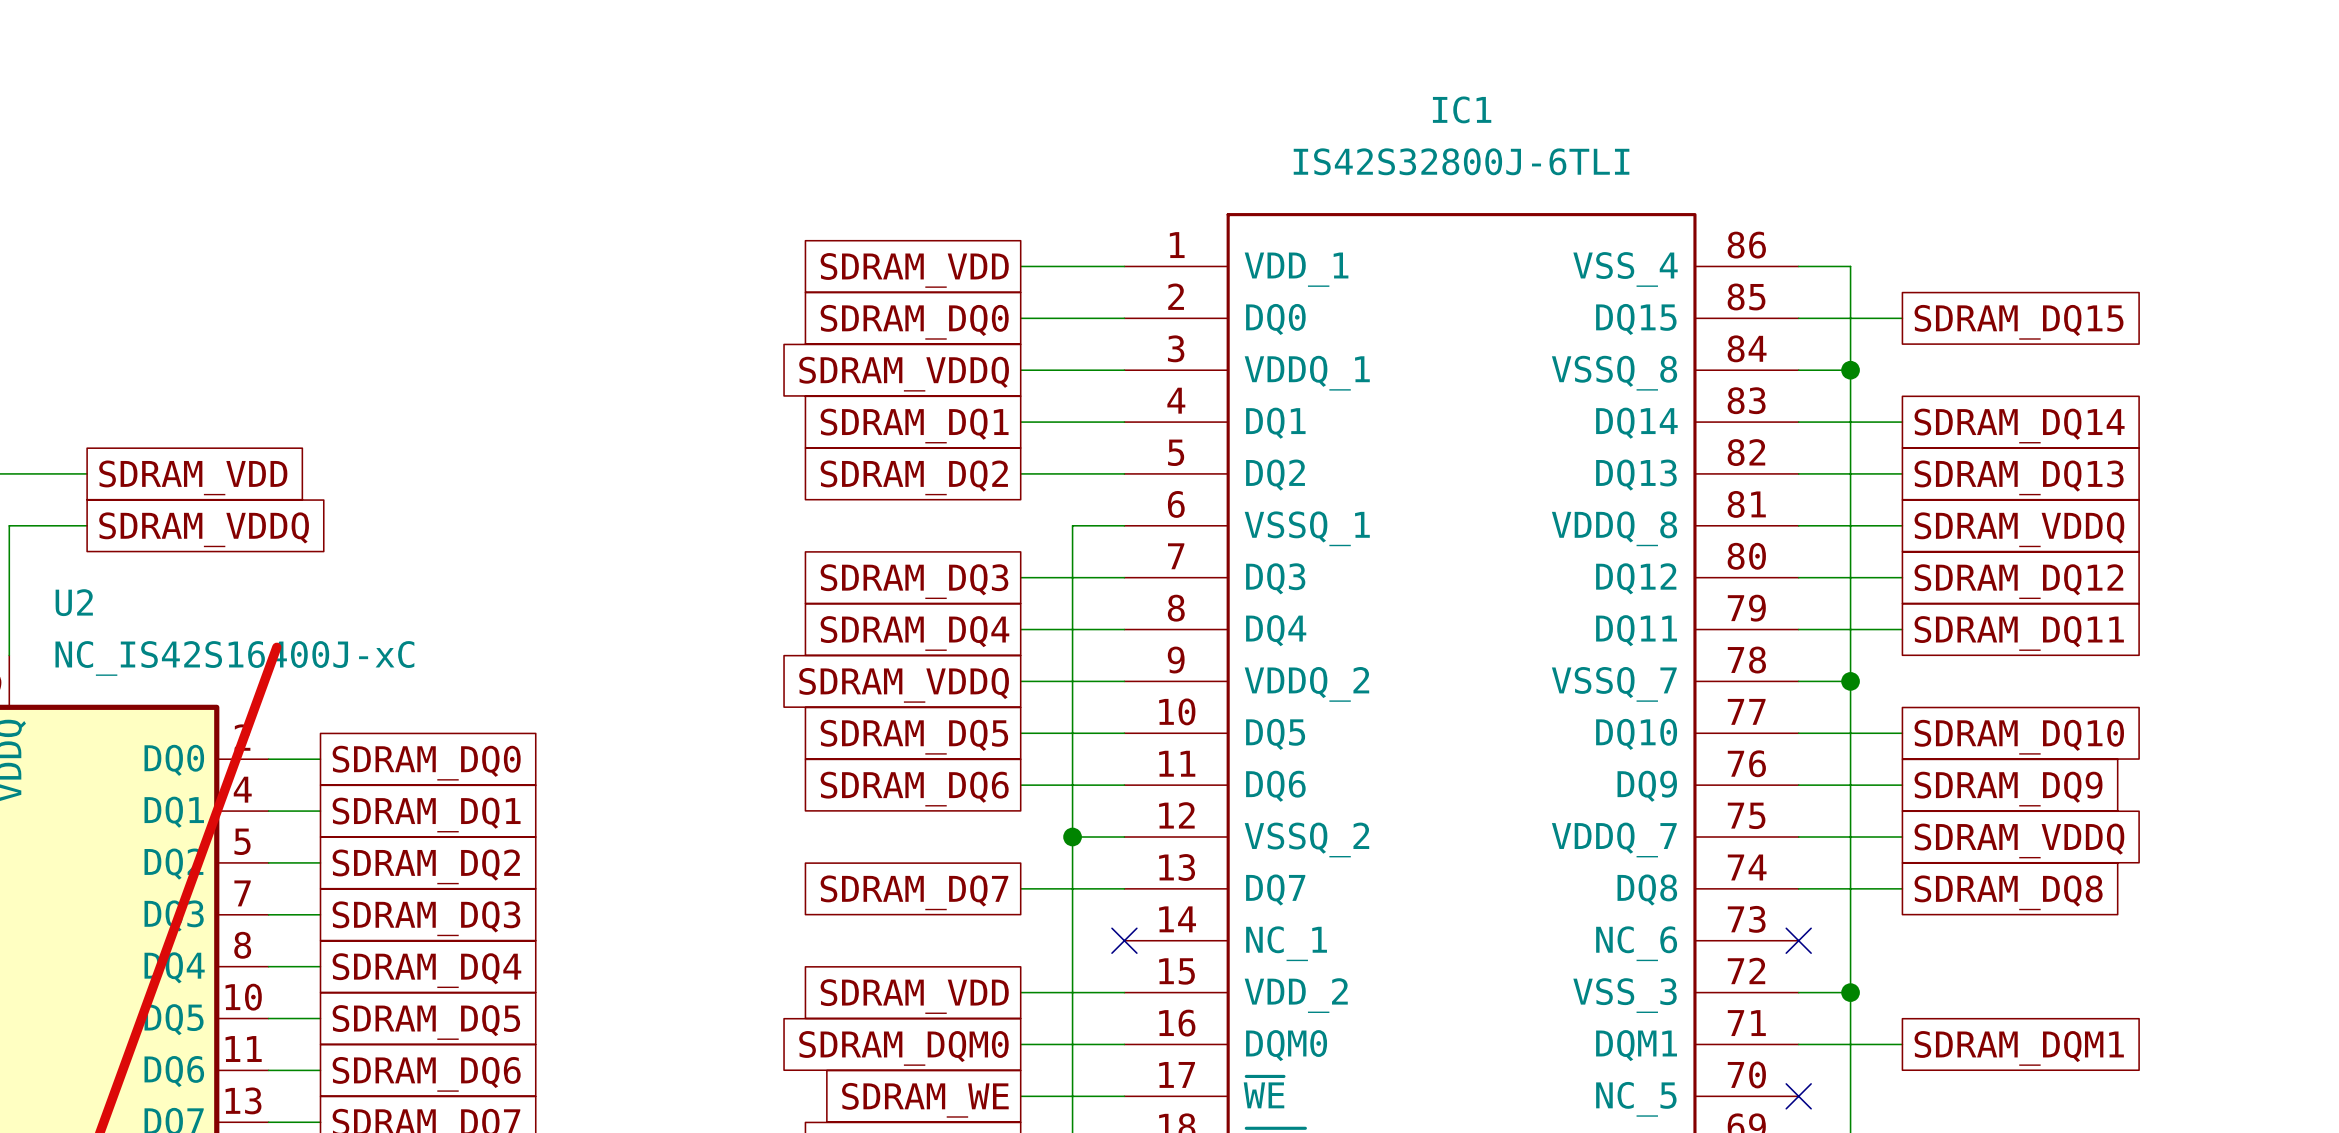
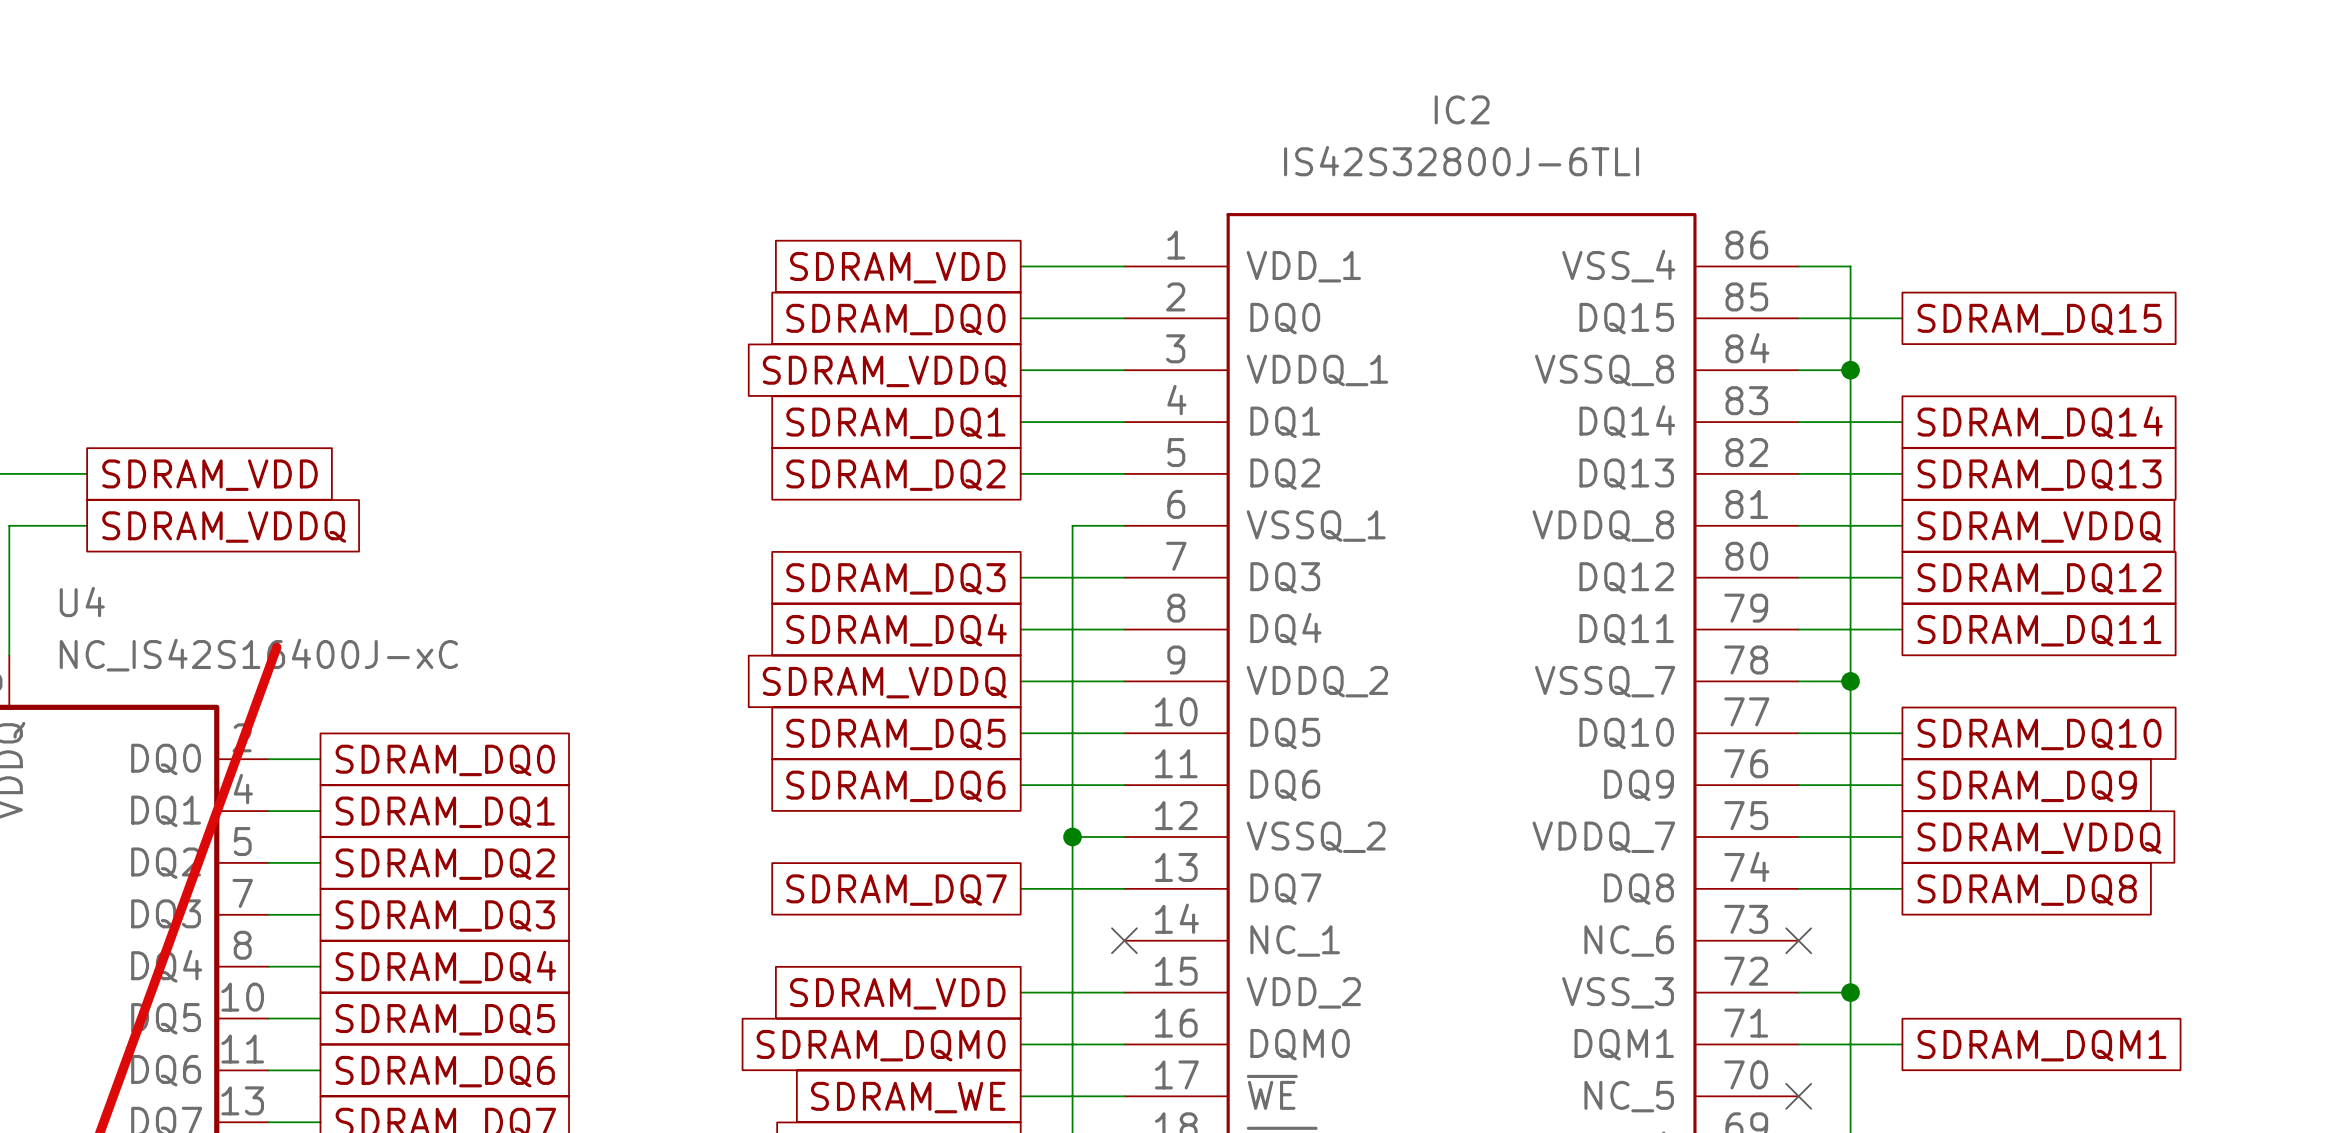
IC1 name: IC1 (1462, 109) -> IC2 (1462, 109)
U2 name: U2 (74, 602) -> U4 (82, 602)

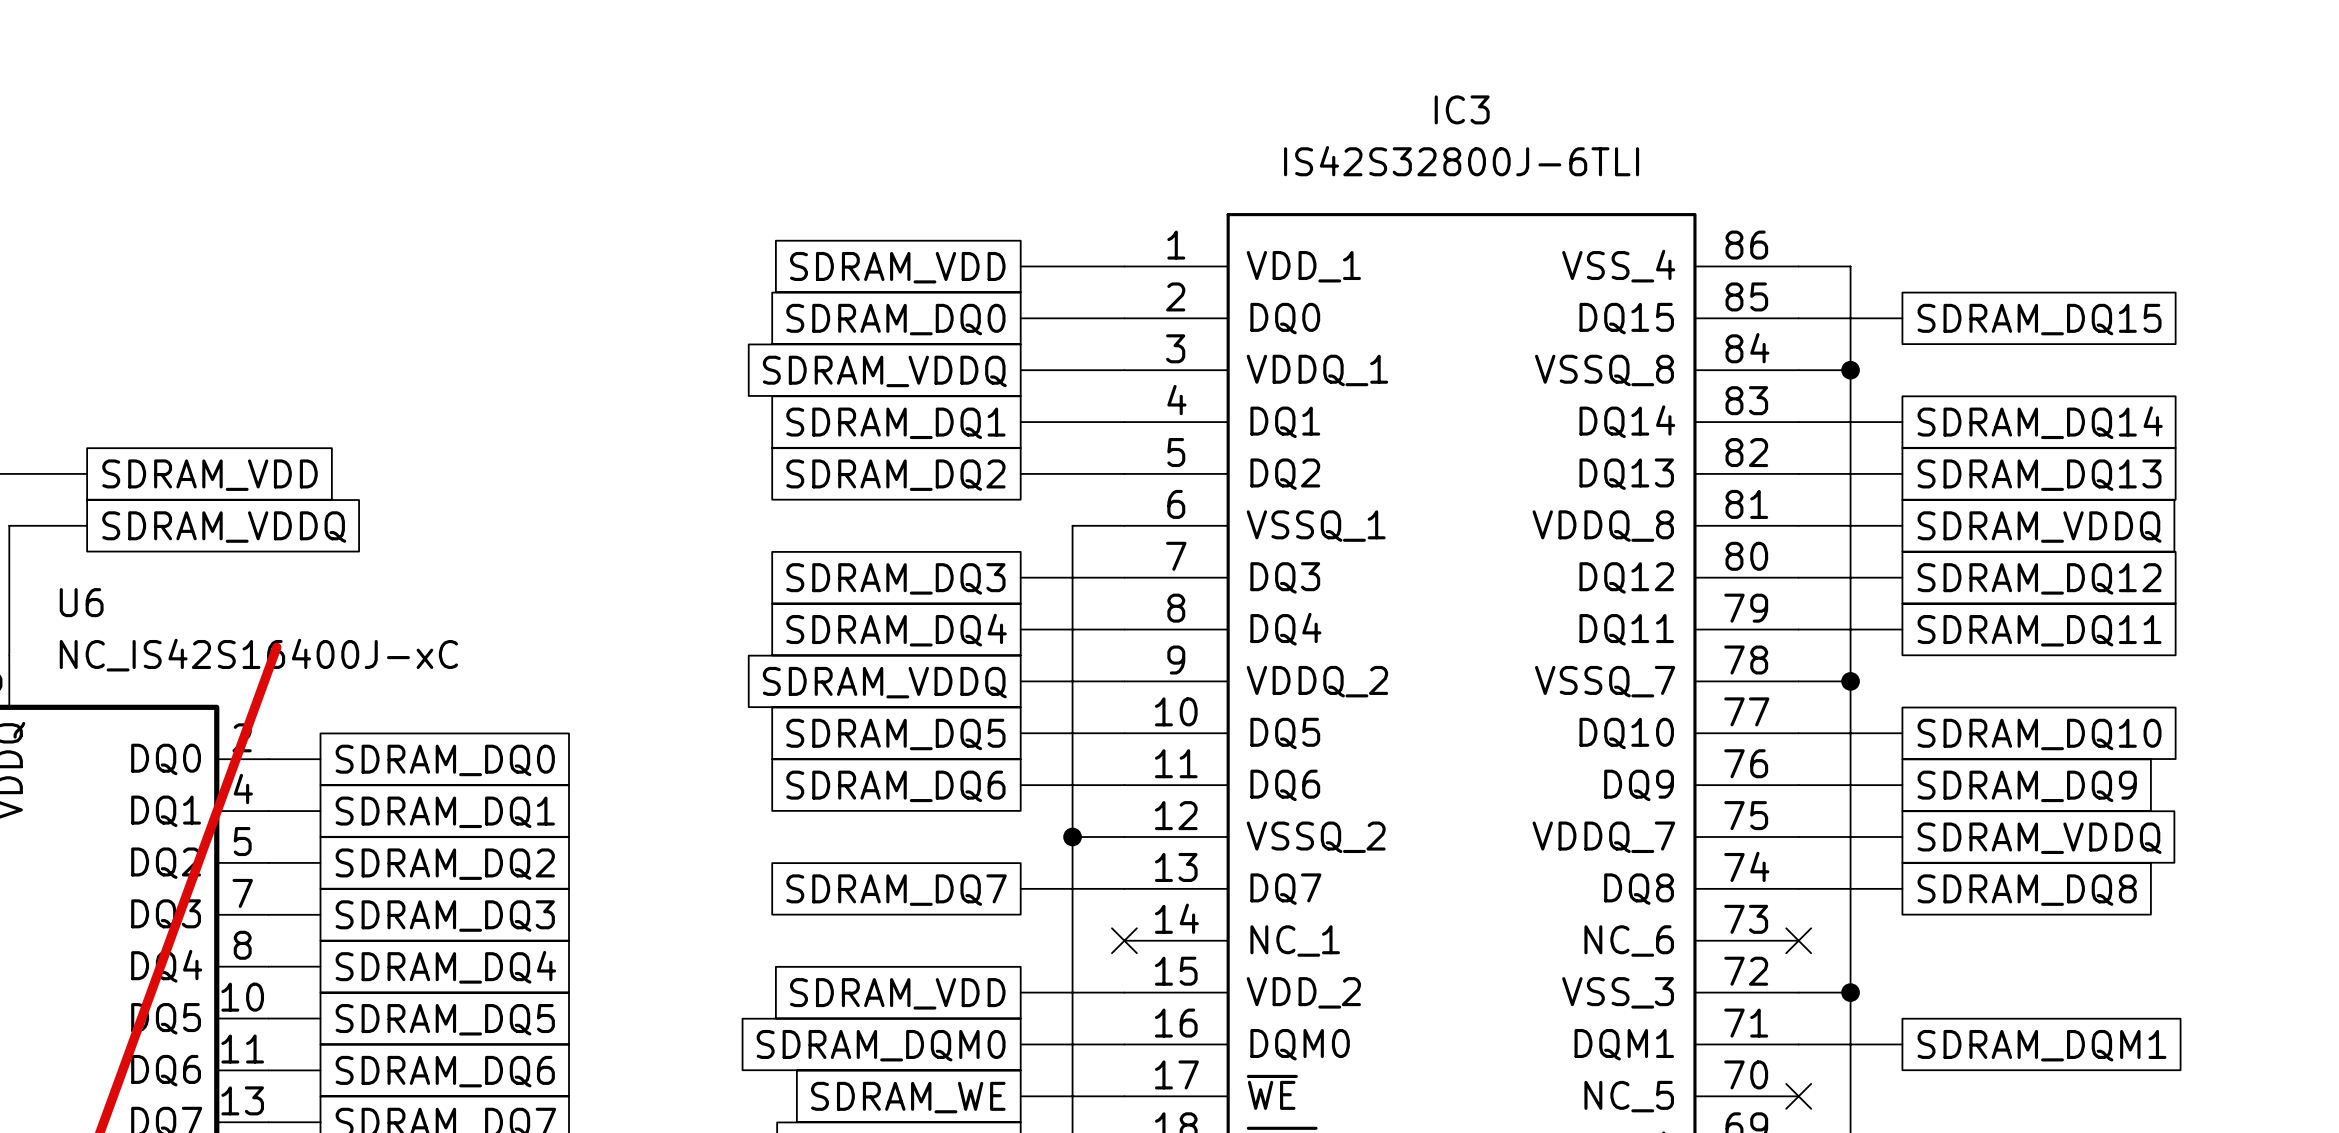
IC2 name: IC2 (1462, 109) -> IC3 (1462, 109)
U4 name: U4 (82, 602) -> U6 (81, 602)

